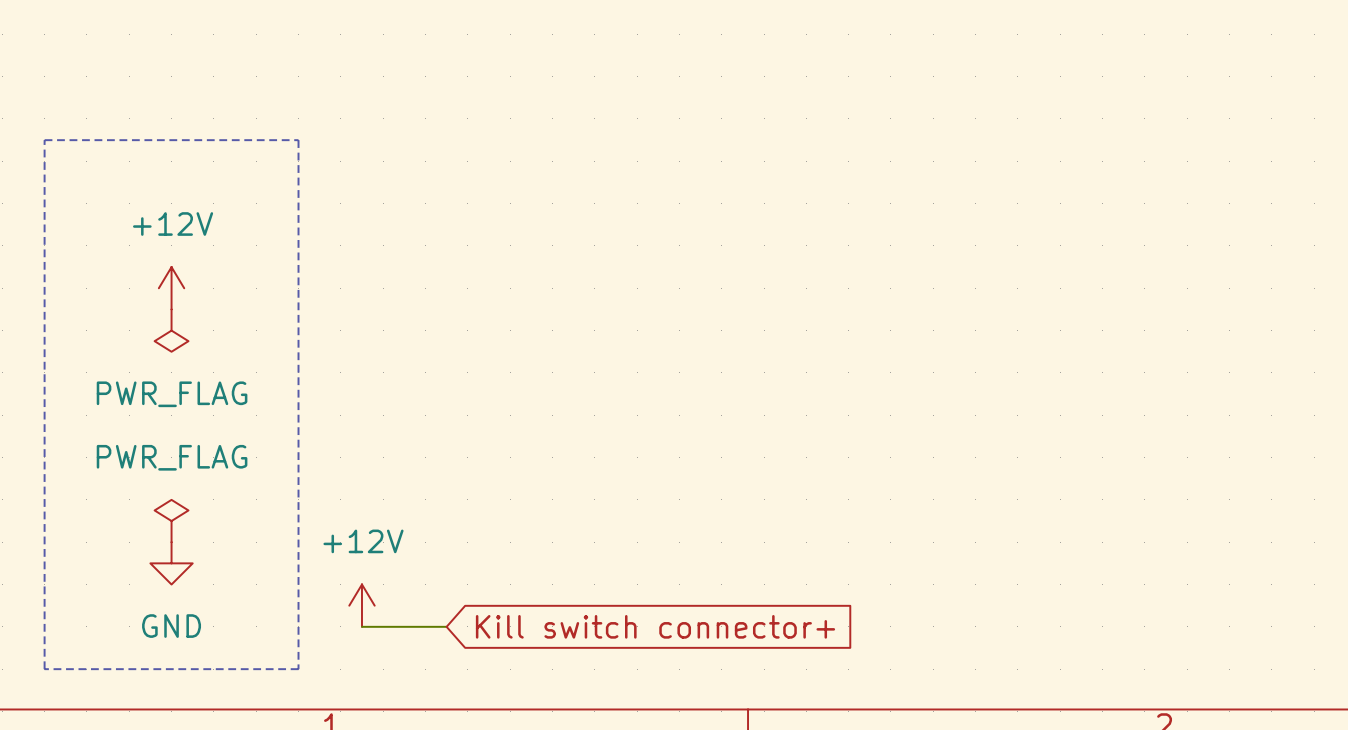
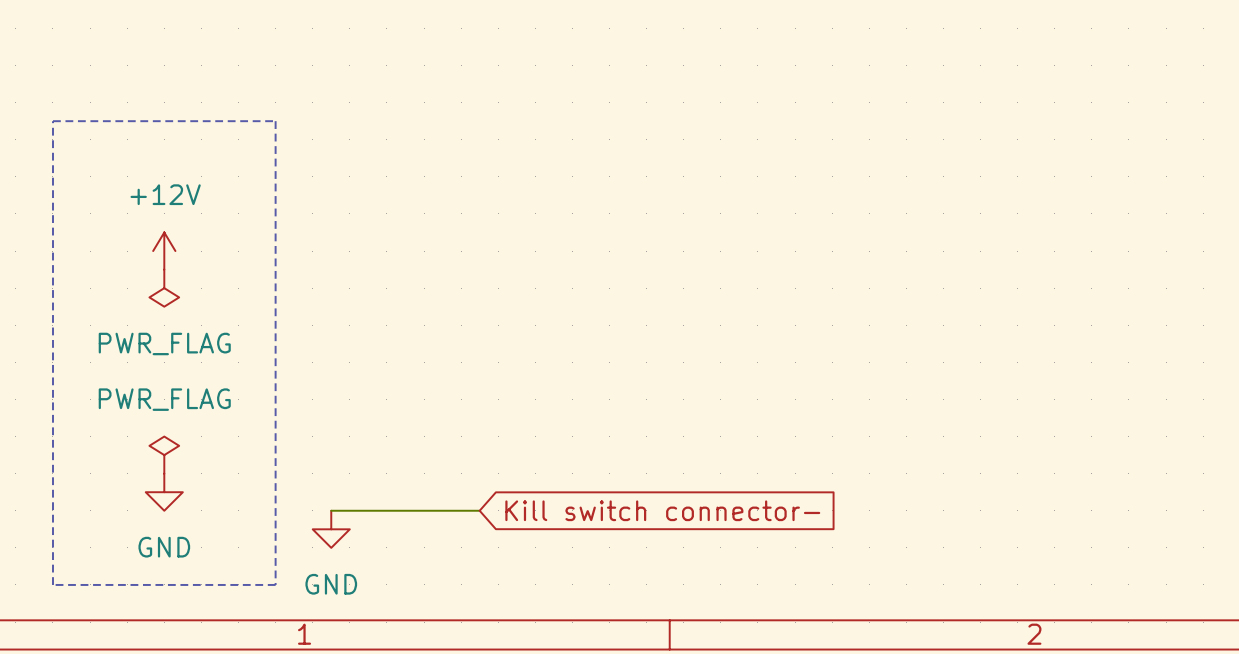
wire: none -> (331, 510) (479, 510)
power symbol: +12V (361, 605) -> GND (331, 529)
wire: (361, 626) (446, 626) -> none
global label: Kill switch connector+ (655, 626) -> Kill switch connector- (662, 510)

